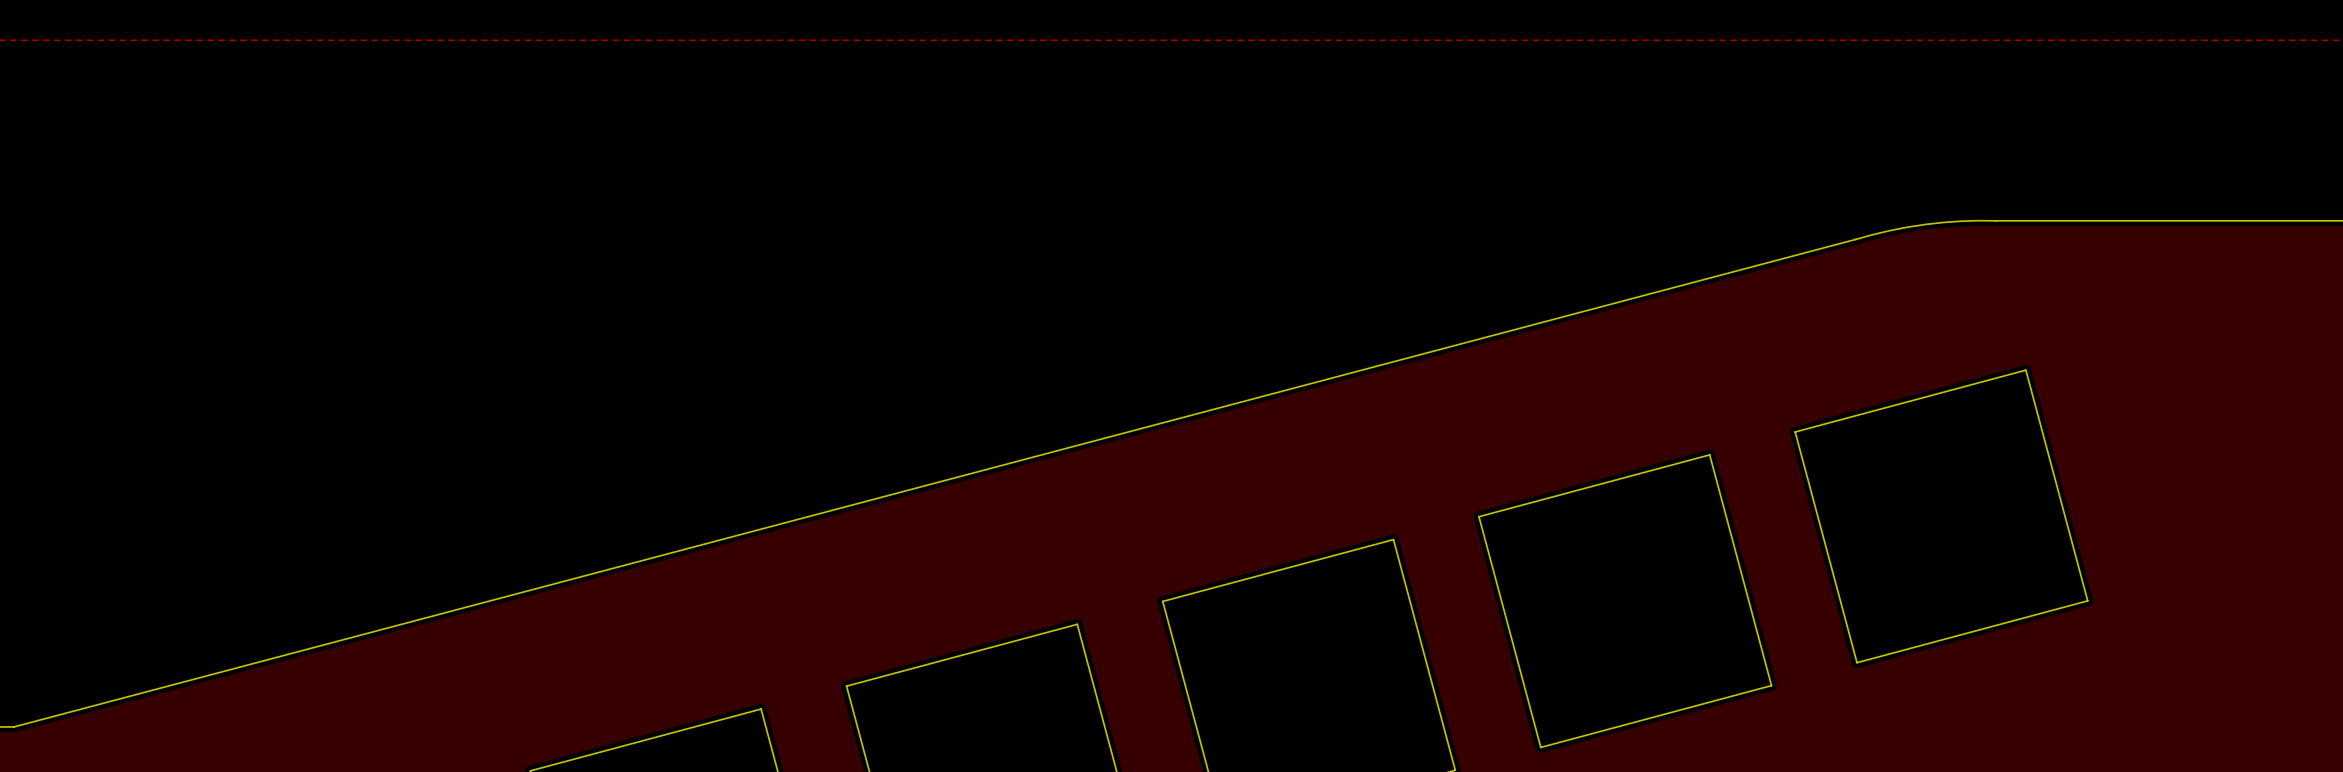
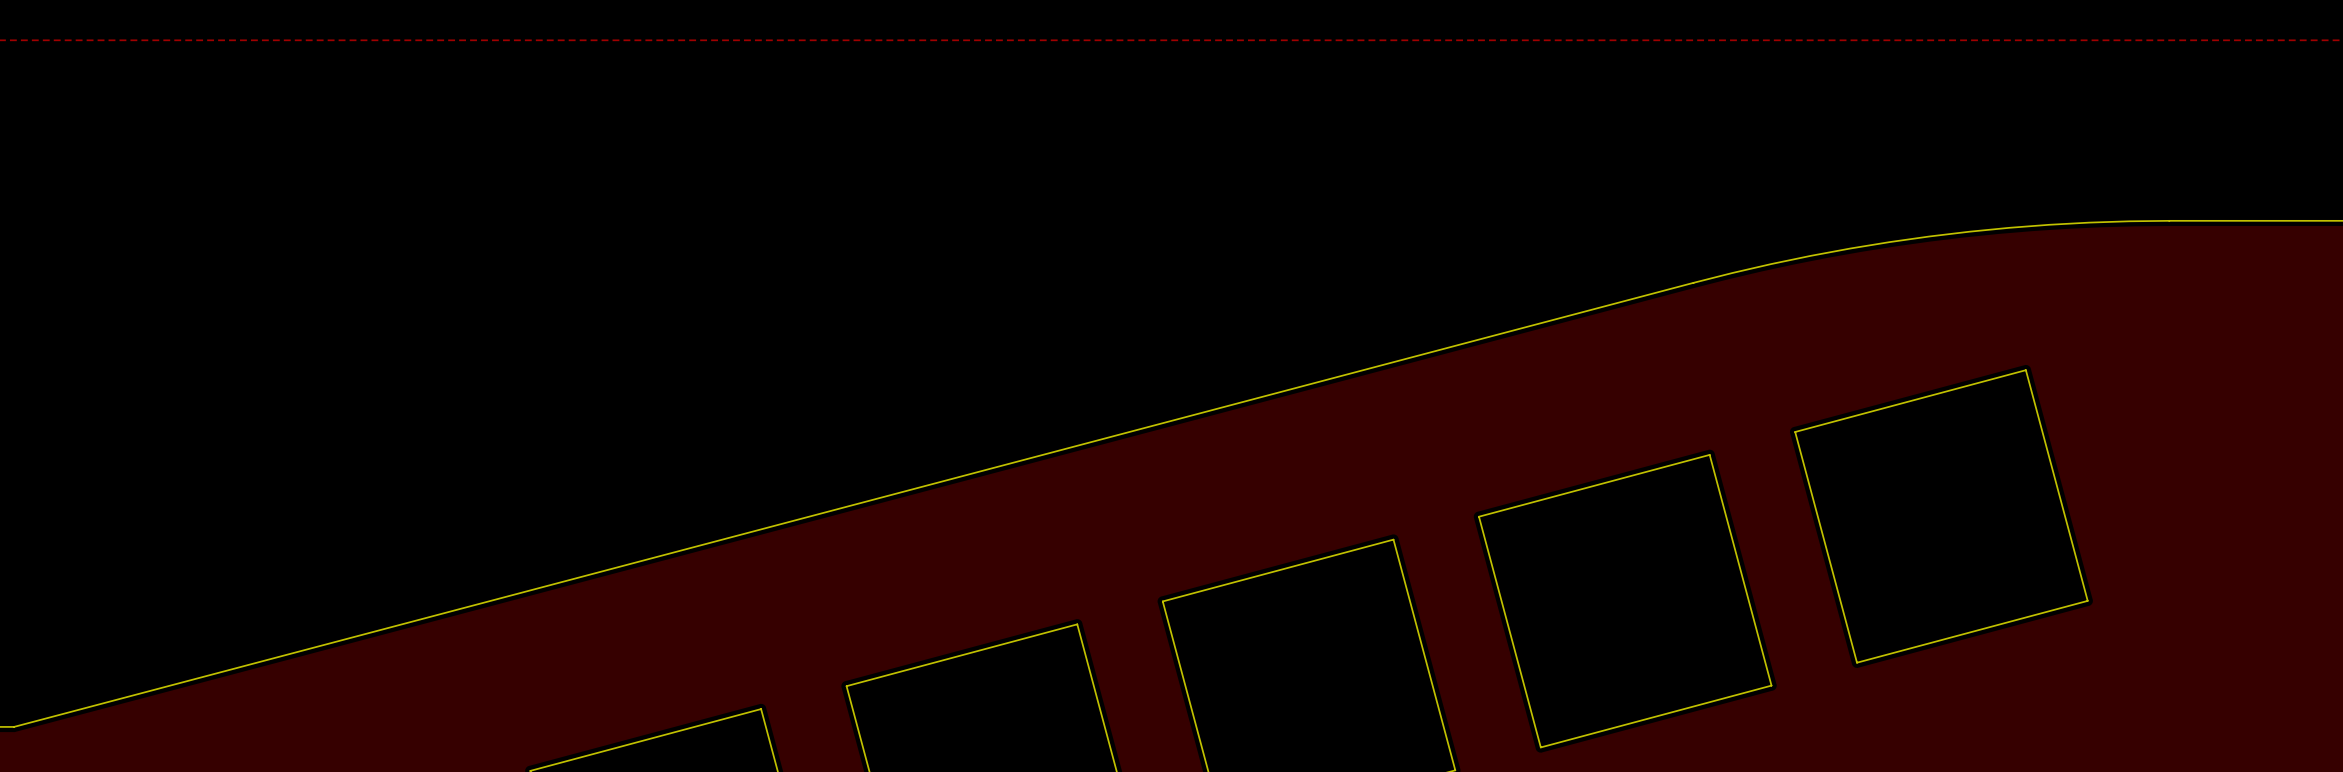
board edge: (2169, 220) (1960, 221) (1890, 230) (13, 726) -> (2169, 220) (2089, 222) (1969, 231) (1850, 248) (1732, 272) (13, 726)

